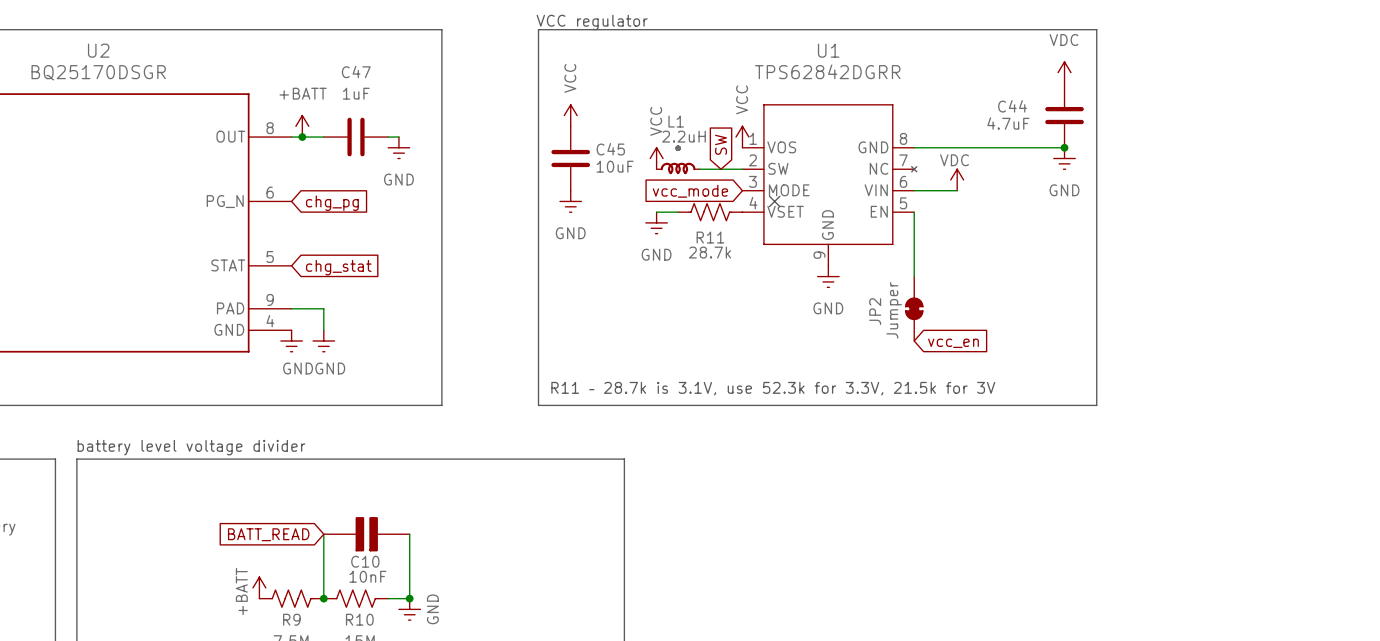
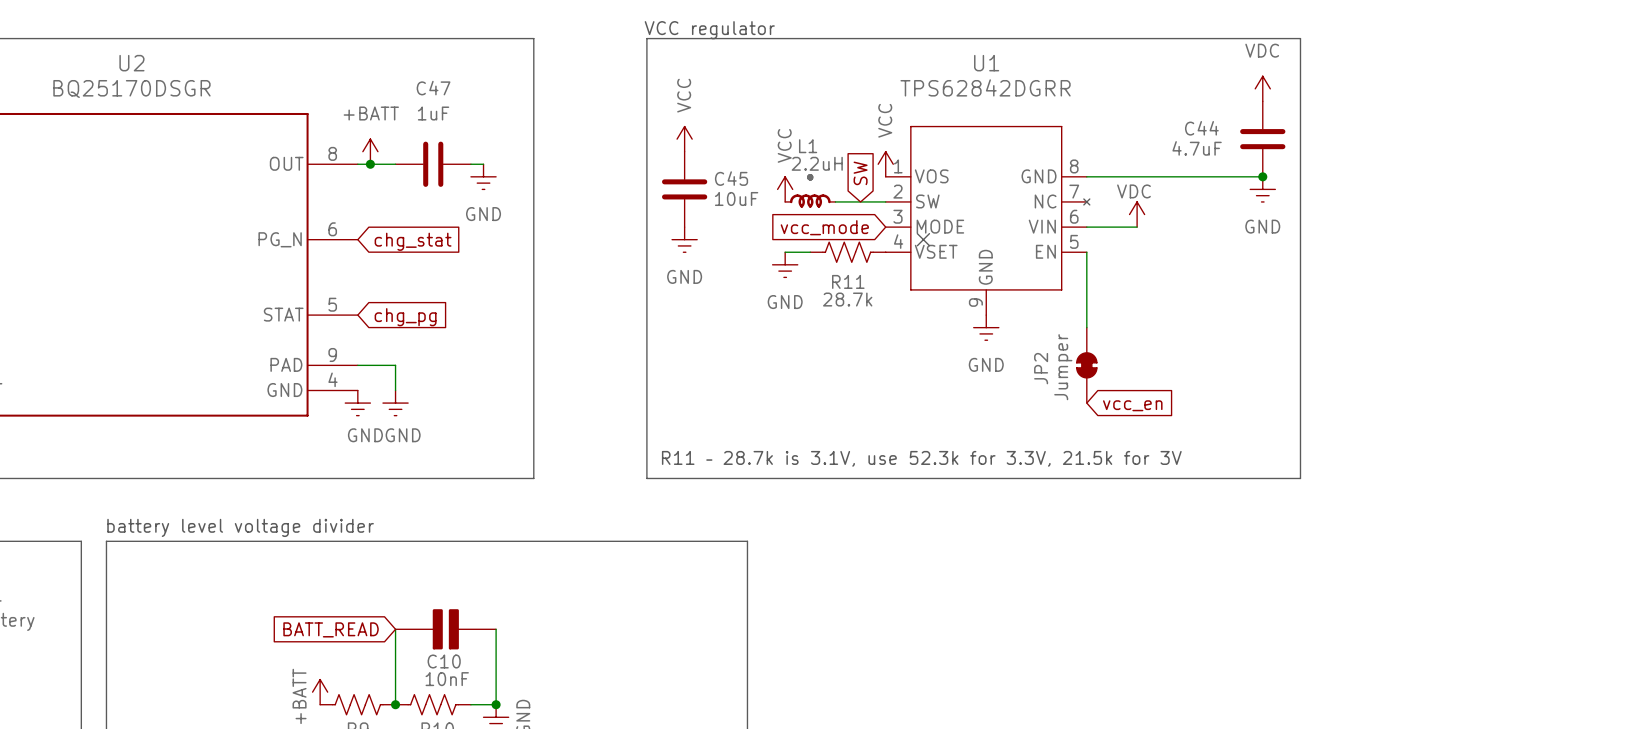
global label: chg_pg (332, 203) -> chg_stat (413, 241)
global label: chg_stat (338, 267) -> chg_pg (405, 317)

